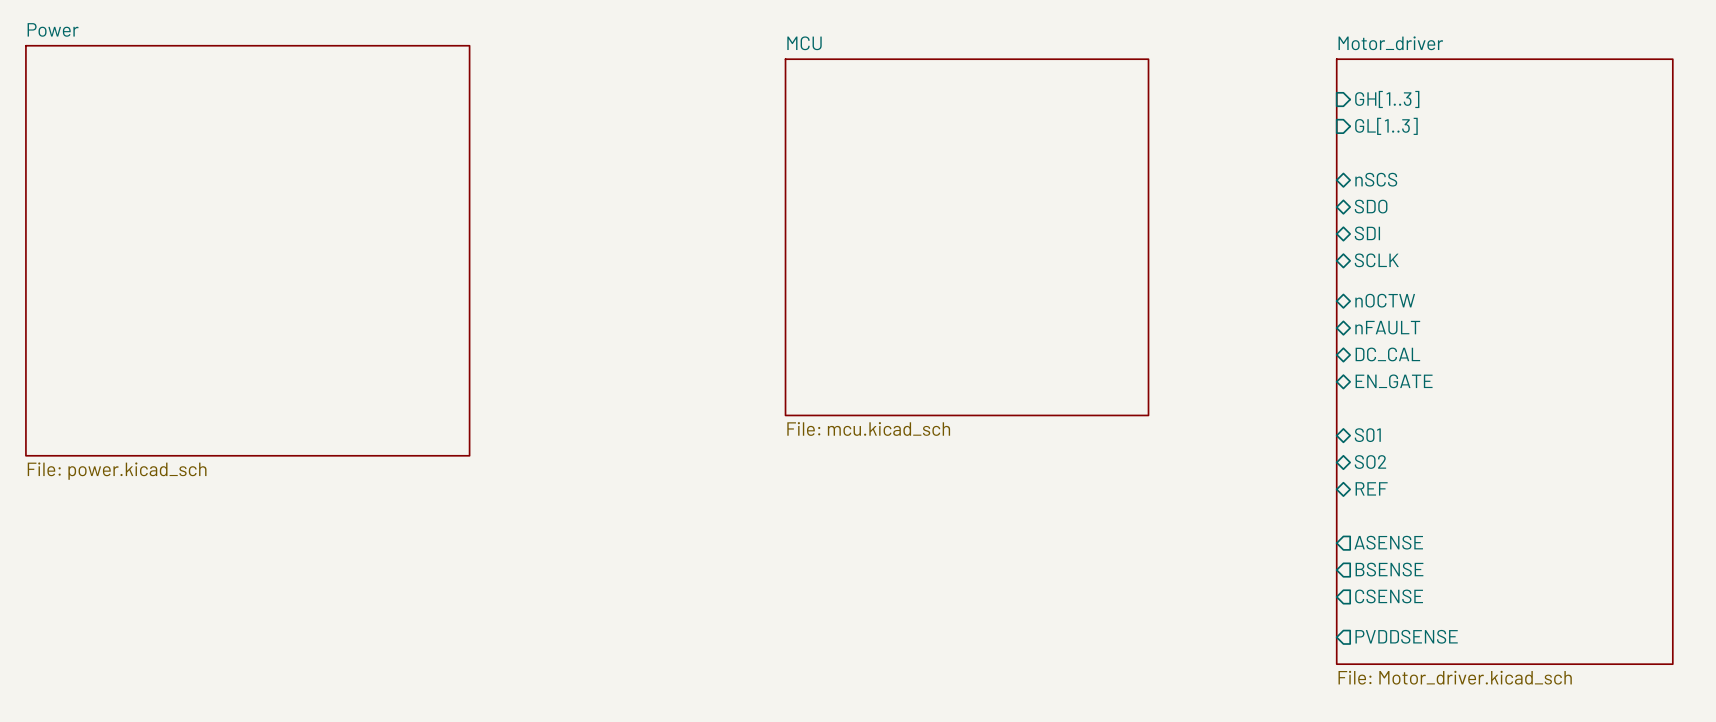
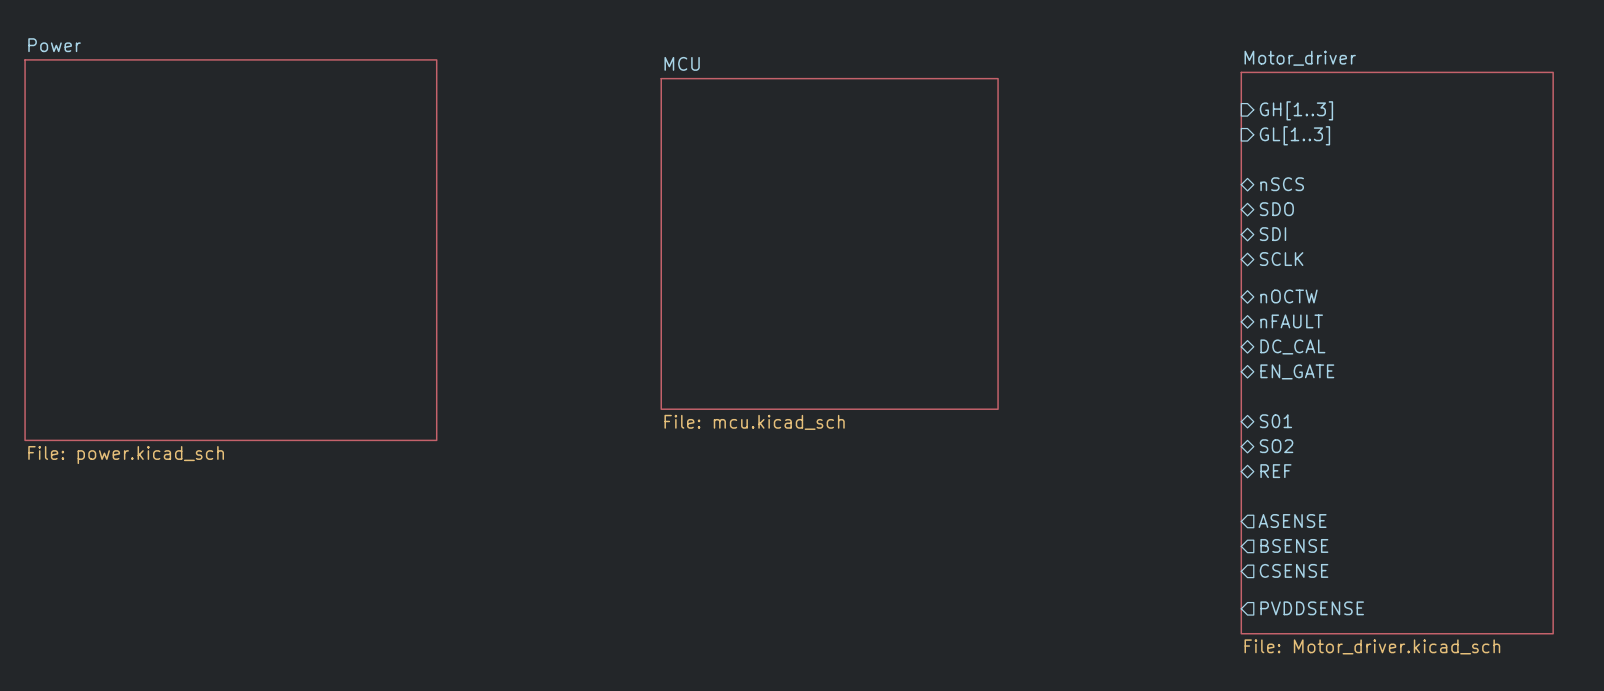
sheet MCU position: (967, 237) -> (829, 243)

